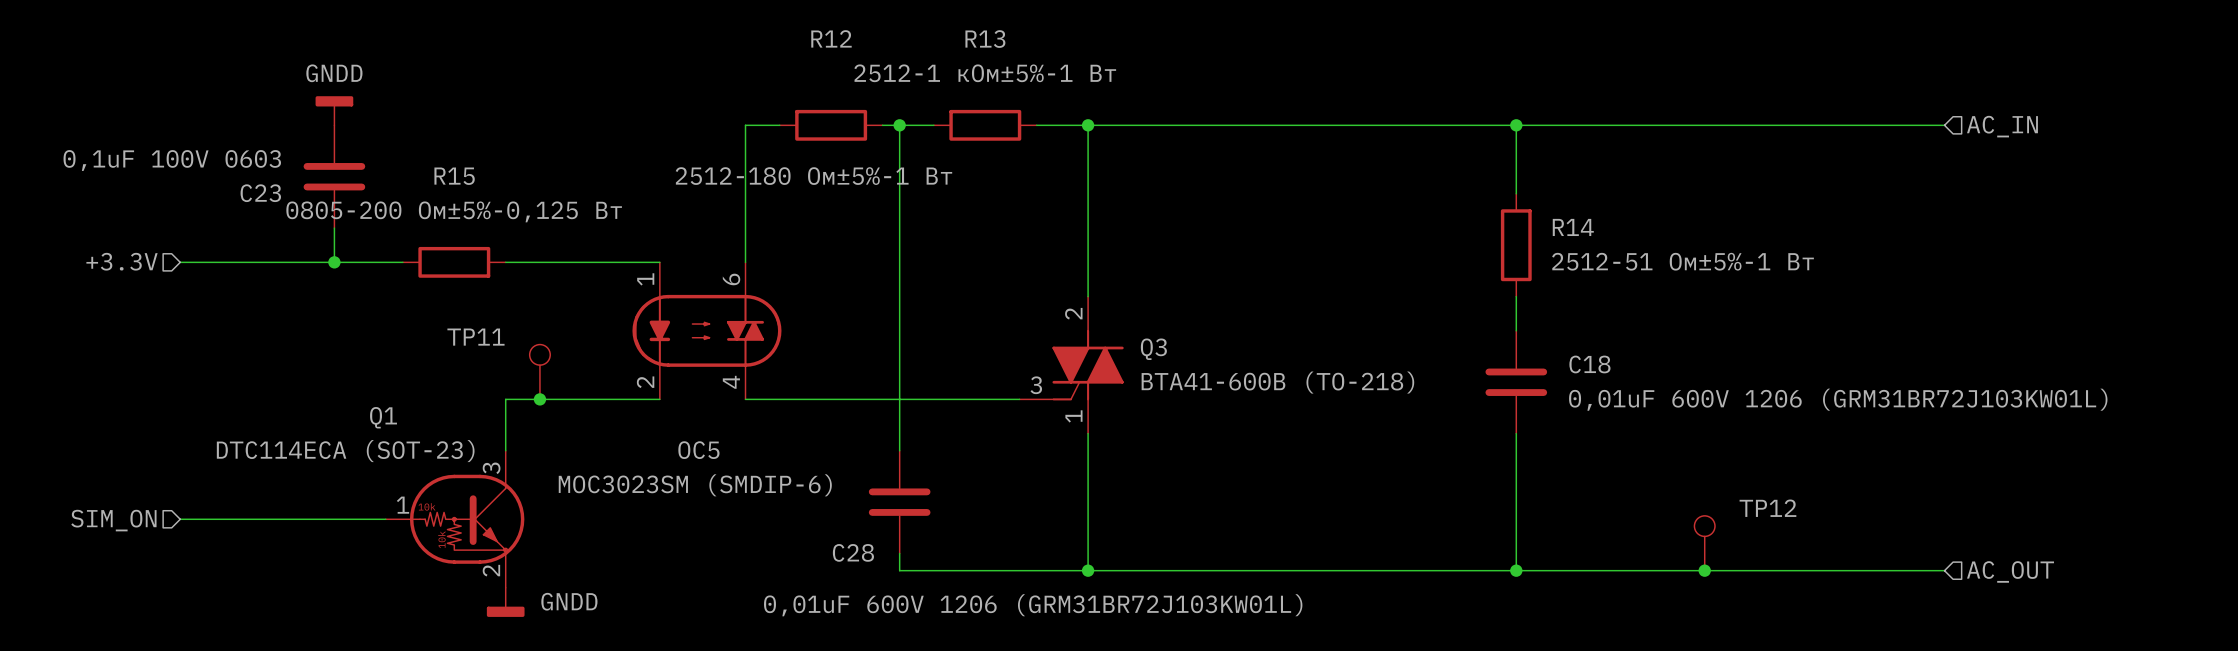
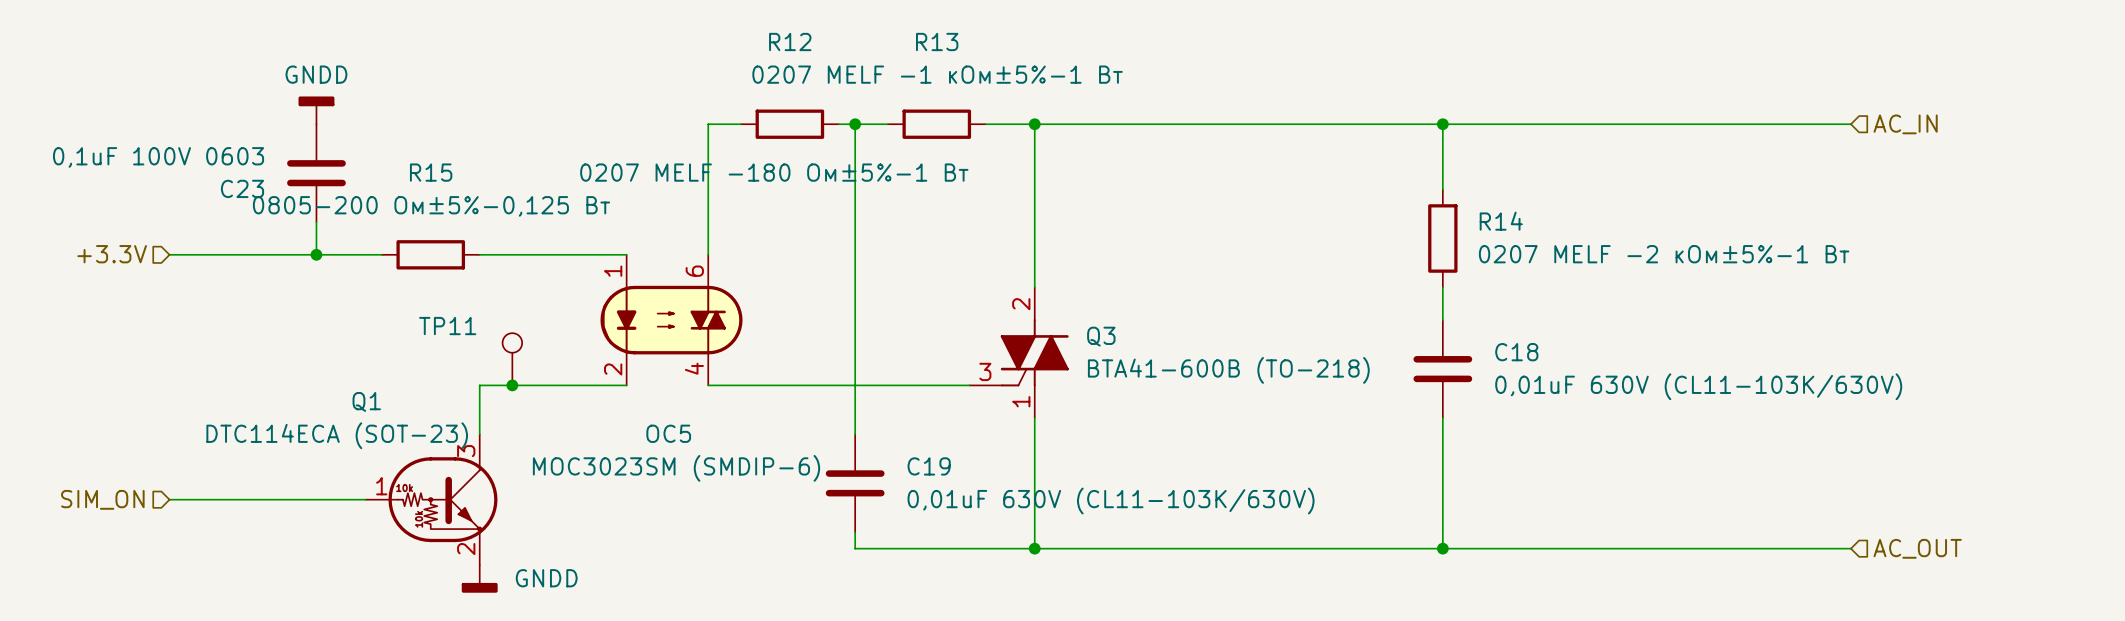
R13 value: 2512-1 кОм±5%-1 Вт (985, 73) -> 0207 MELF -1 кОм±5%-1 Вт (937, 74)
R12 value: 2512-180 Ом±5%-1 Вт (813, 176) -> 0207 MELF -180 Ом±5%-1 Вт (774, 172)
R14 value: 2512-51 Ом±5%-1 Вт (1683, 261) -> 0207 MELF -2 кОм±5%-1 Вт (1664, 254)
C18 value: 0,01uF 600V 1206 (GRM31BR72J103KW01L) (1838, 399) -> 0,01uF 630V (CL11-103K/630V) (1698, 386)
TP12: (1704, 543) -> none
C28 name: C28 (853, 552) -> C19 (929, 466)
junction: (1704, 570) -> none
C28 value: 0,01uF 600V 1206 (GRM31BR72J103KW01L) (1033, 605) -> 0,01uF 630V (CL11-103K/630V) (1111, 501)

